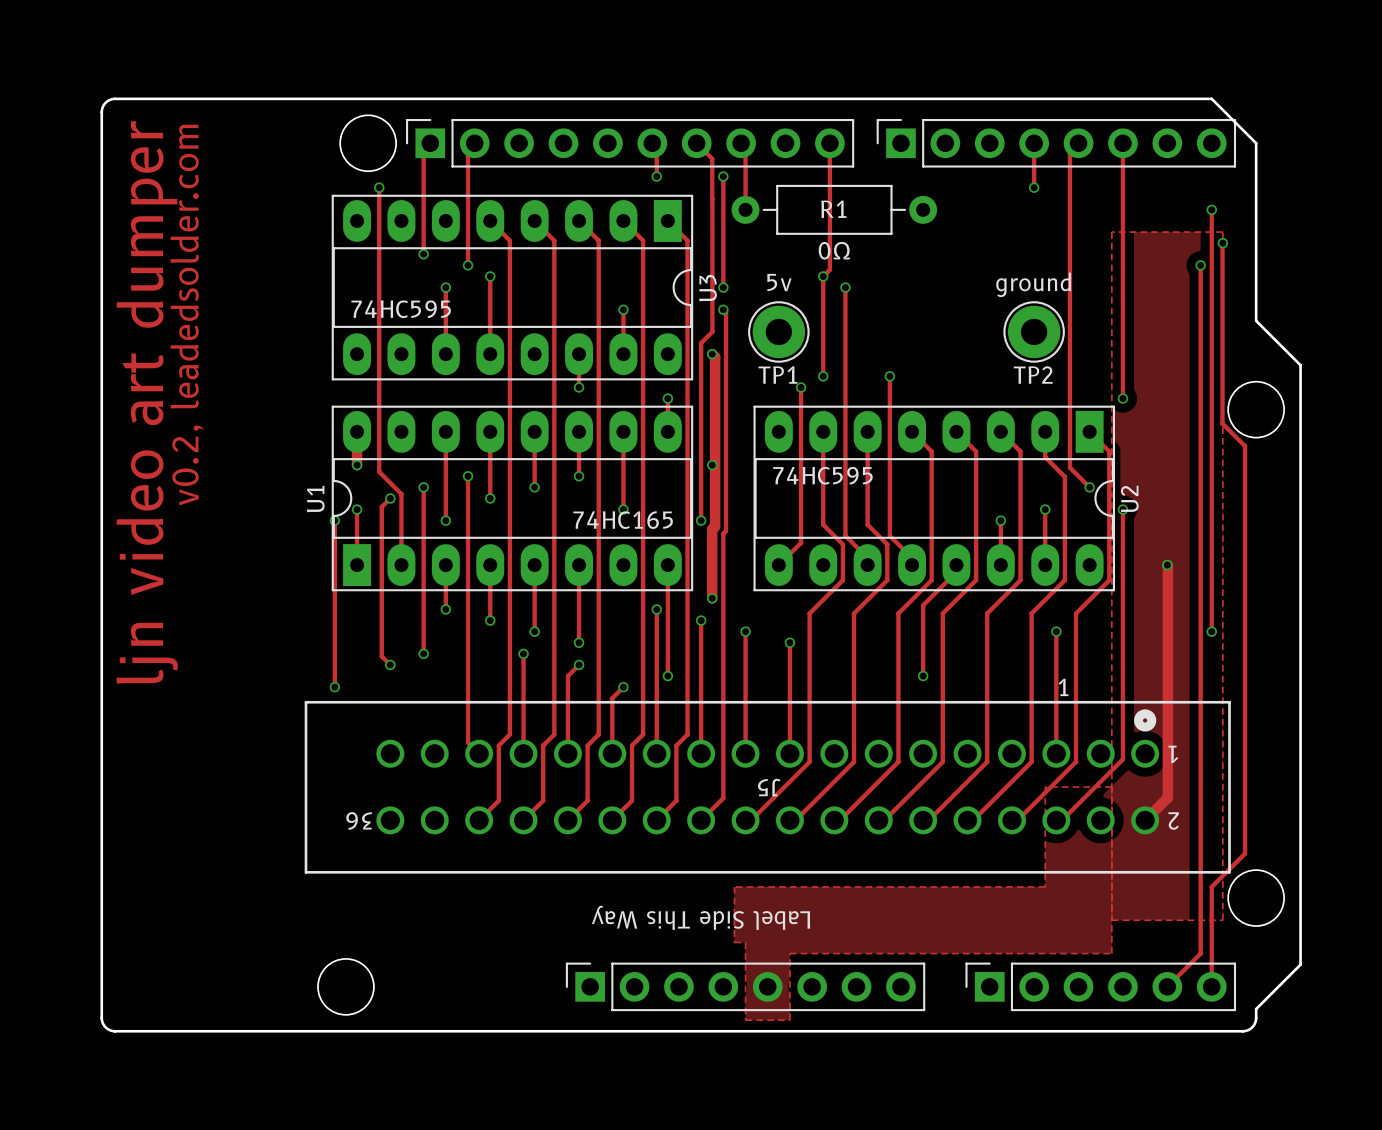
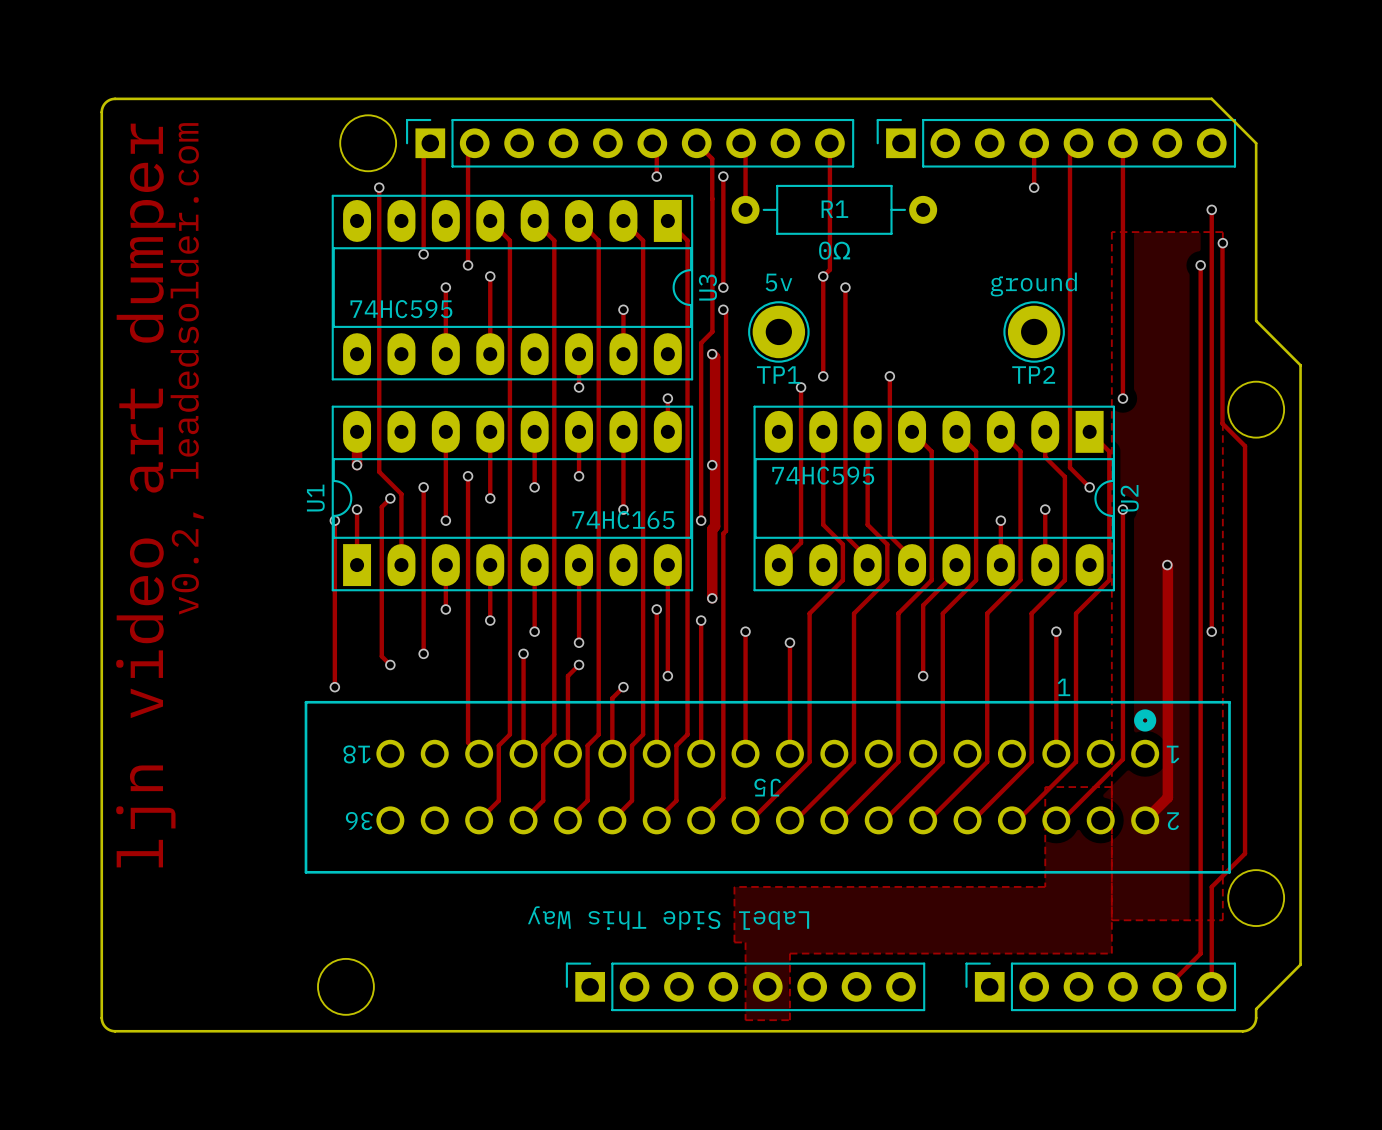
J5 text: none -> 18 (357, 754)

